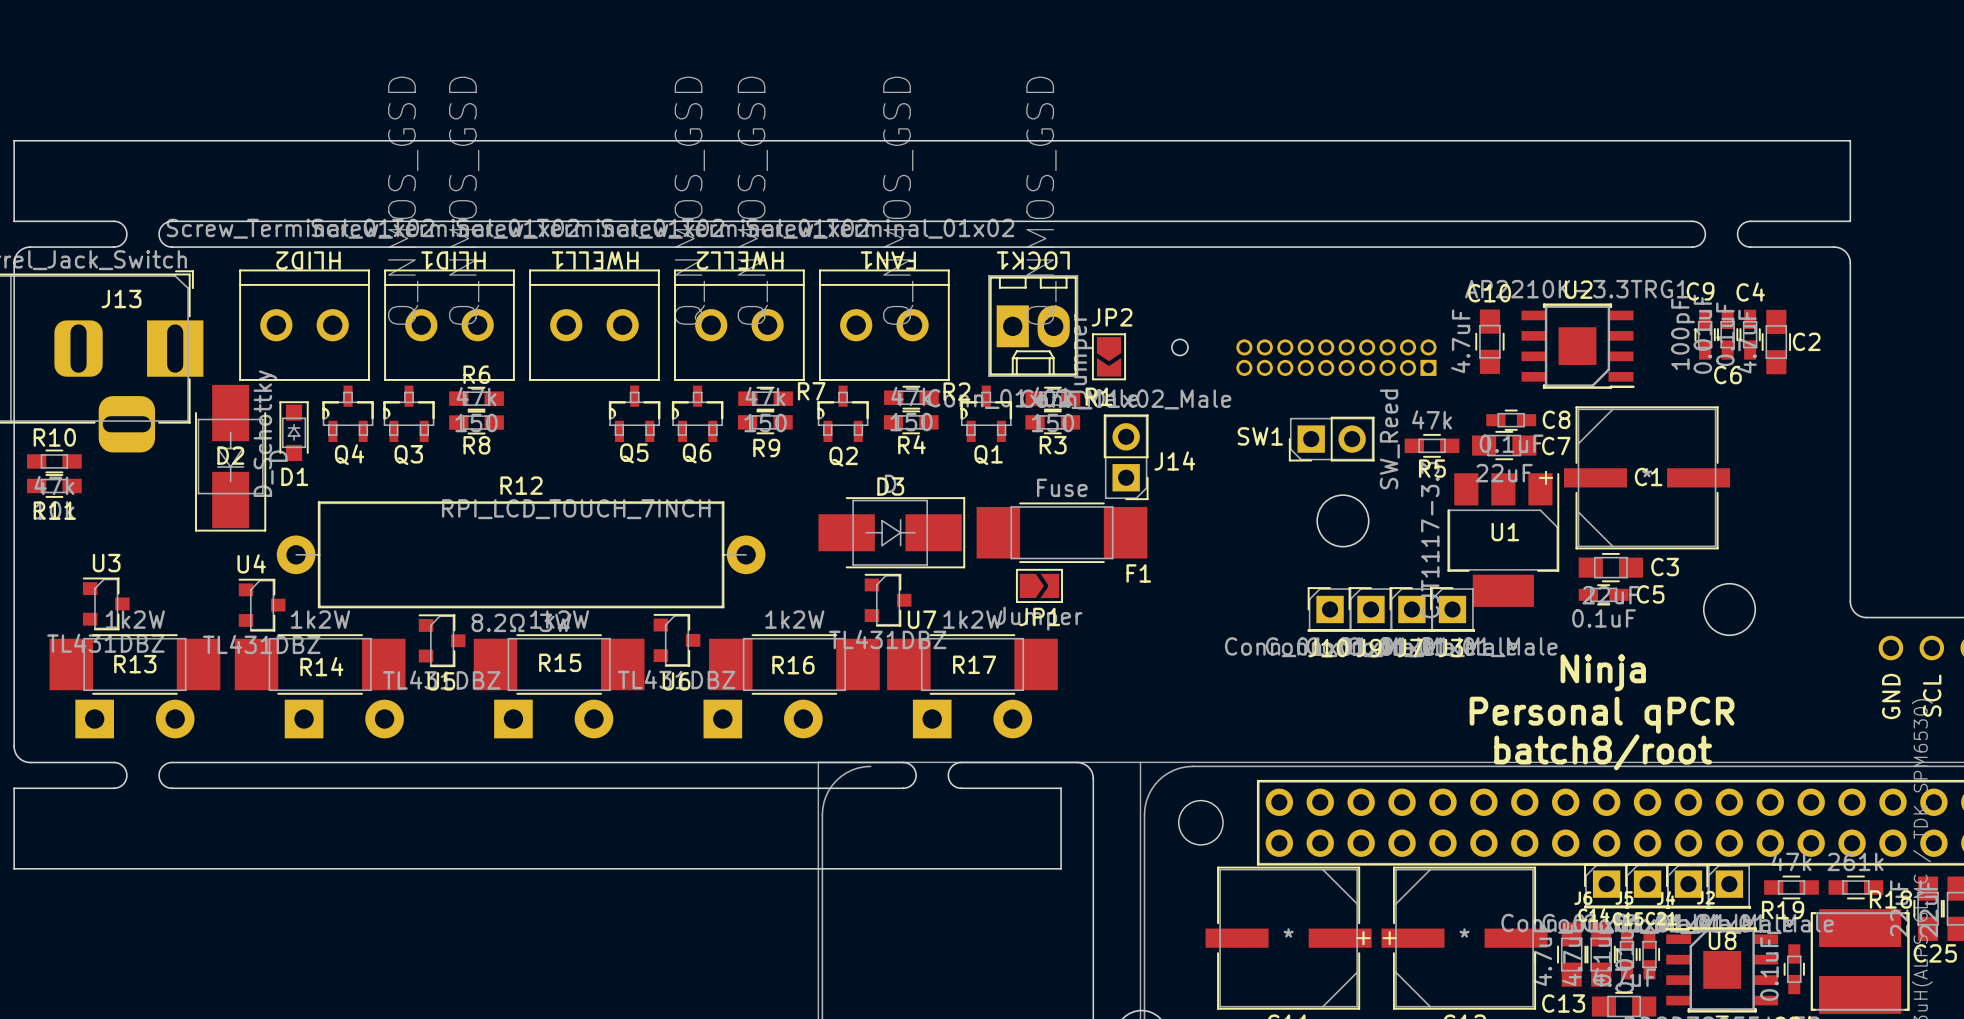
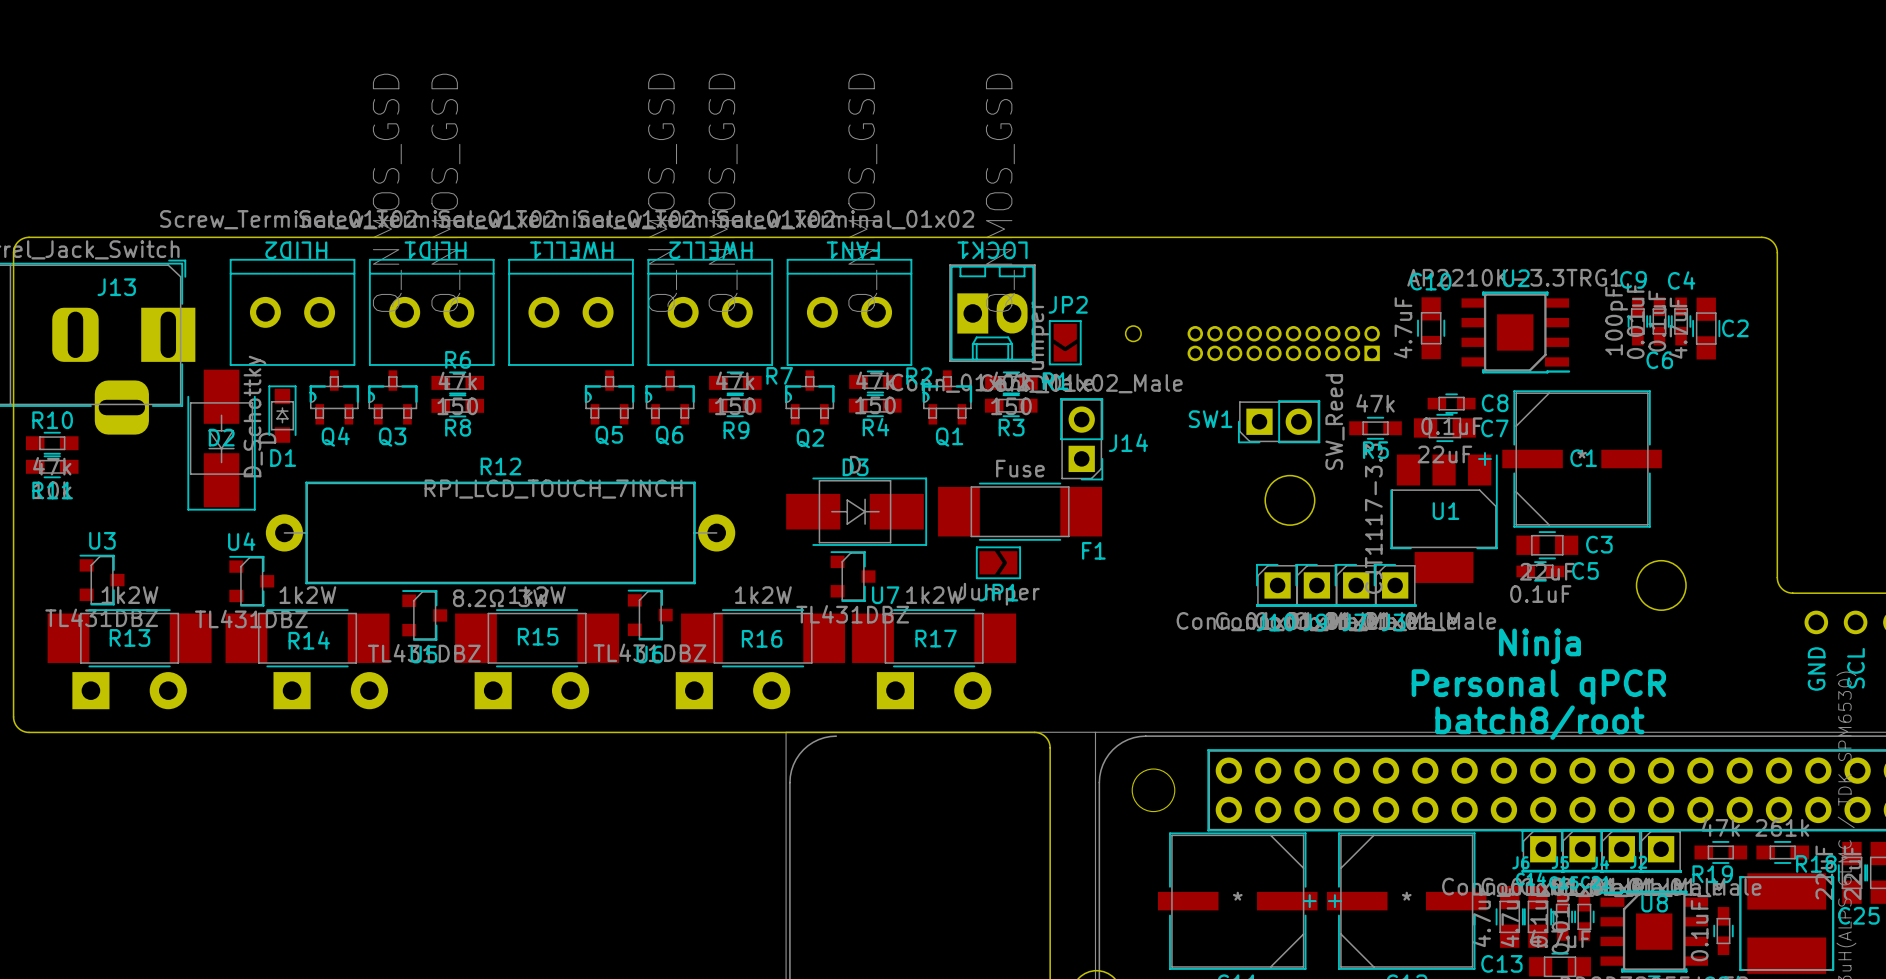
board edge: (113, 247) (123, 243) (126, 235) (125, 227) (117, 221) (14, 221) (14, 140) (1850, 140) (1850, 221) (1747, 221) (1740, 226) (1737, 235) (1742, 244) (1750, 247) -> (1625, 237) (1681, 237)
board edge: (171, 247) (162, 243) (159, 234) (162, 225) (171, 221) (1692, 221) (1701, 225) (1705, 234) (1701, 243) (1692, 247) -> (165, 237) (109, 237)
board edge: (113, 762) (123, 766) (126, 773) (125, 781) (117, 787) (14, 788) (14, 868) (1061, 868) (1061, 788) (957, 787) (950, 781) (948, 773) (952, 766) (961, 762) -> (109, 732) (165, 732)
board edge: (171, 762) (162, 766) (159, 775) (162, 784) (171, 788) (903, 788) (912, 784) (916, 775) (912, 766) (903, 762) -> (923, 732) (867, 732)

